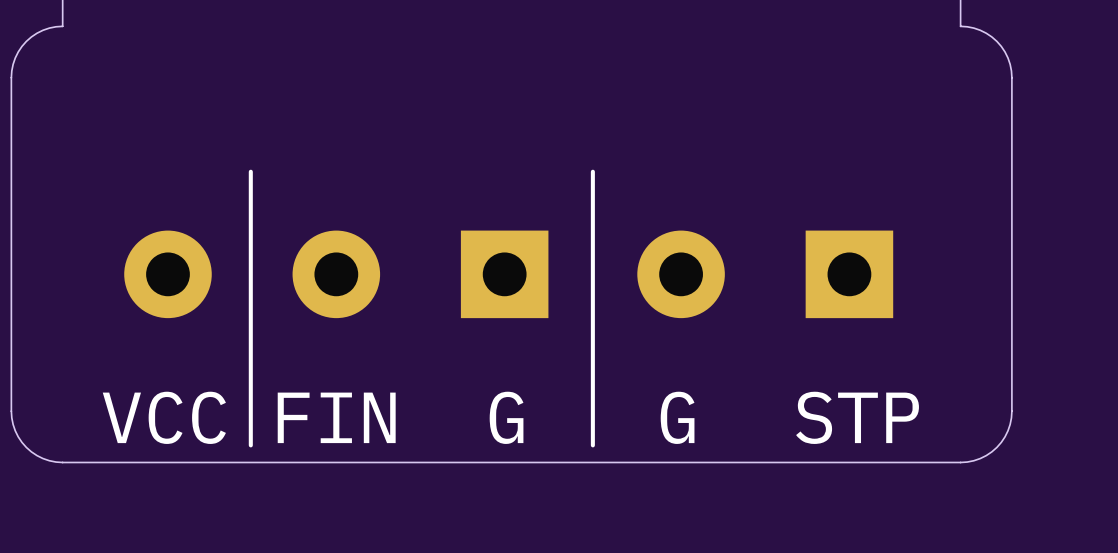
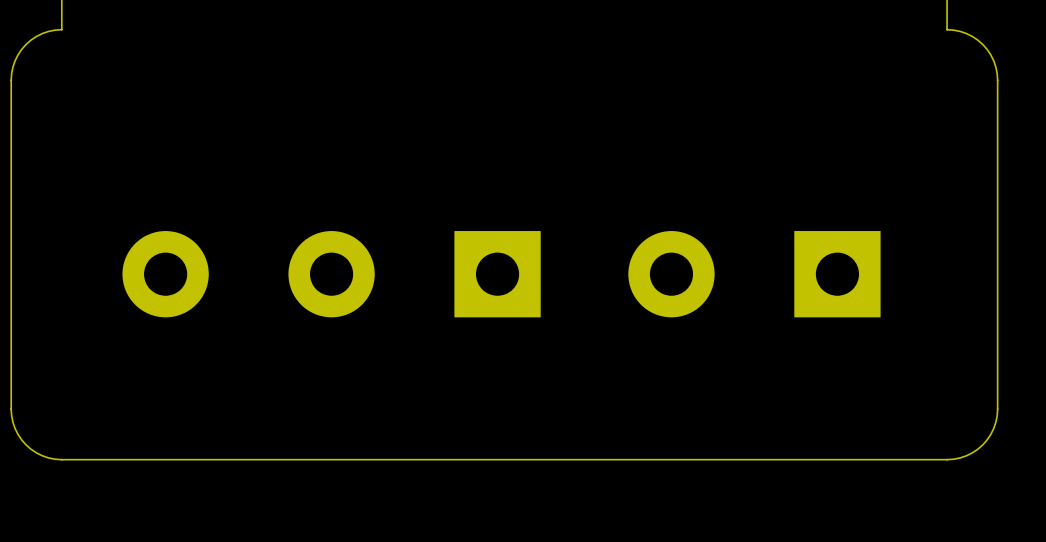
line: (250, 171) (250, 445) -> none
line: (592, 171) (592, 445) -> none
text: VCC (164, 417) -> none
text: FIN (336, 417) -> none
text: G (506, 417) -> none
text: G (677, 417) -> none
text: STP (857, 417) -> none

